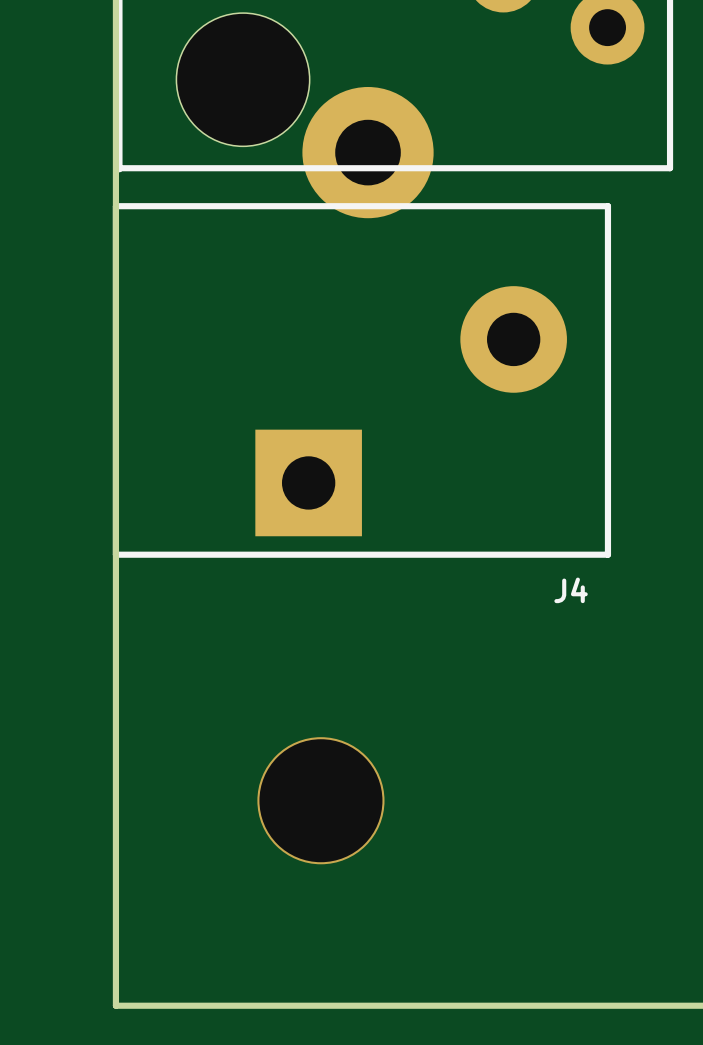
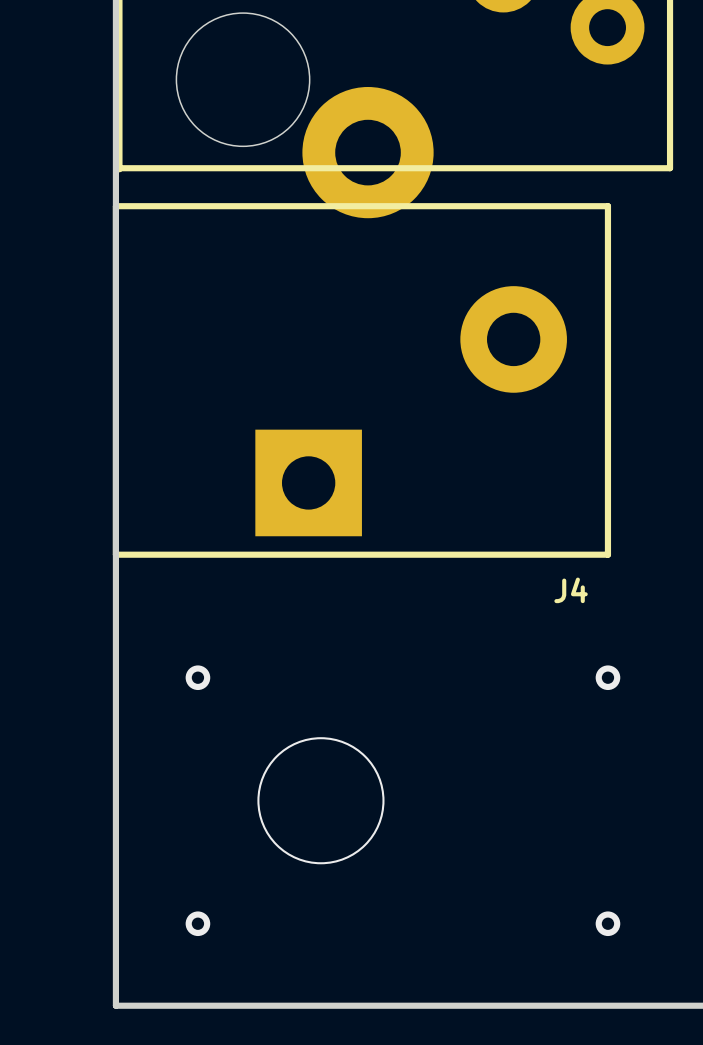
via: none -> (197, 677)
via: none -> (607, 677)
via: none -> (197, 923)
via: none -> (607, 923)

